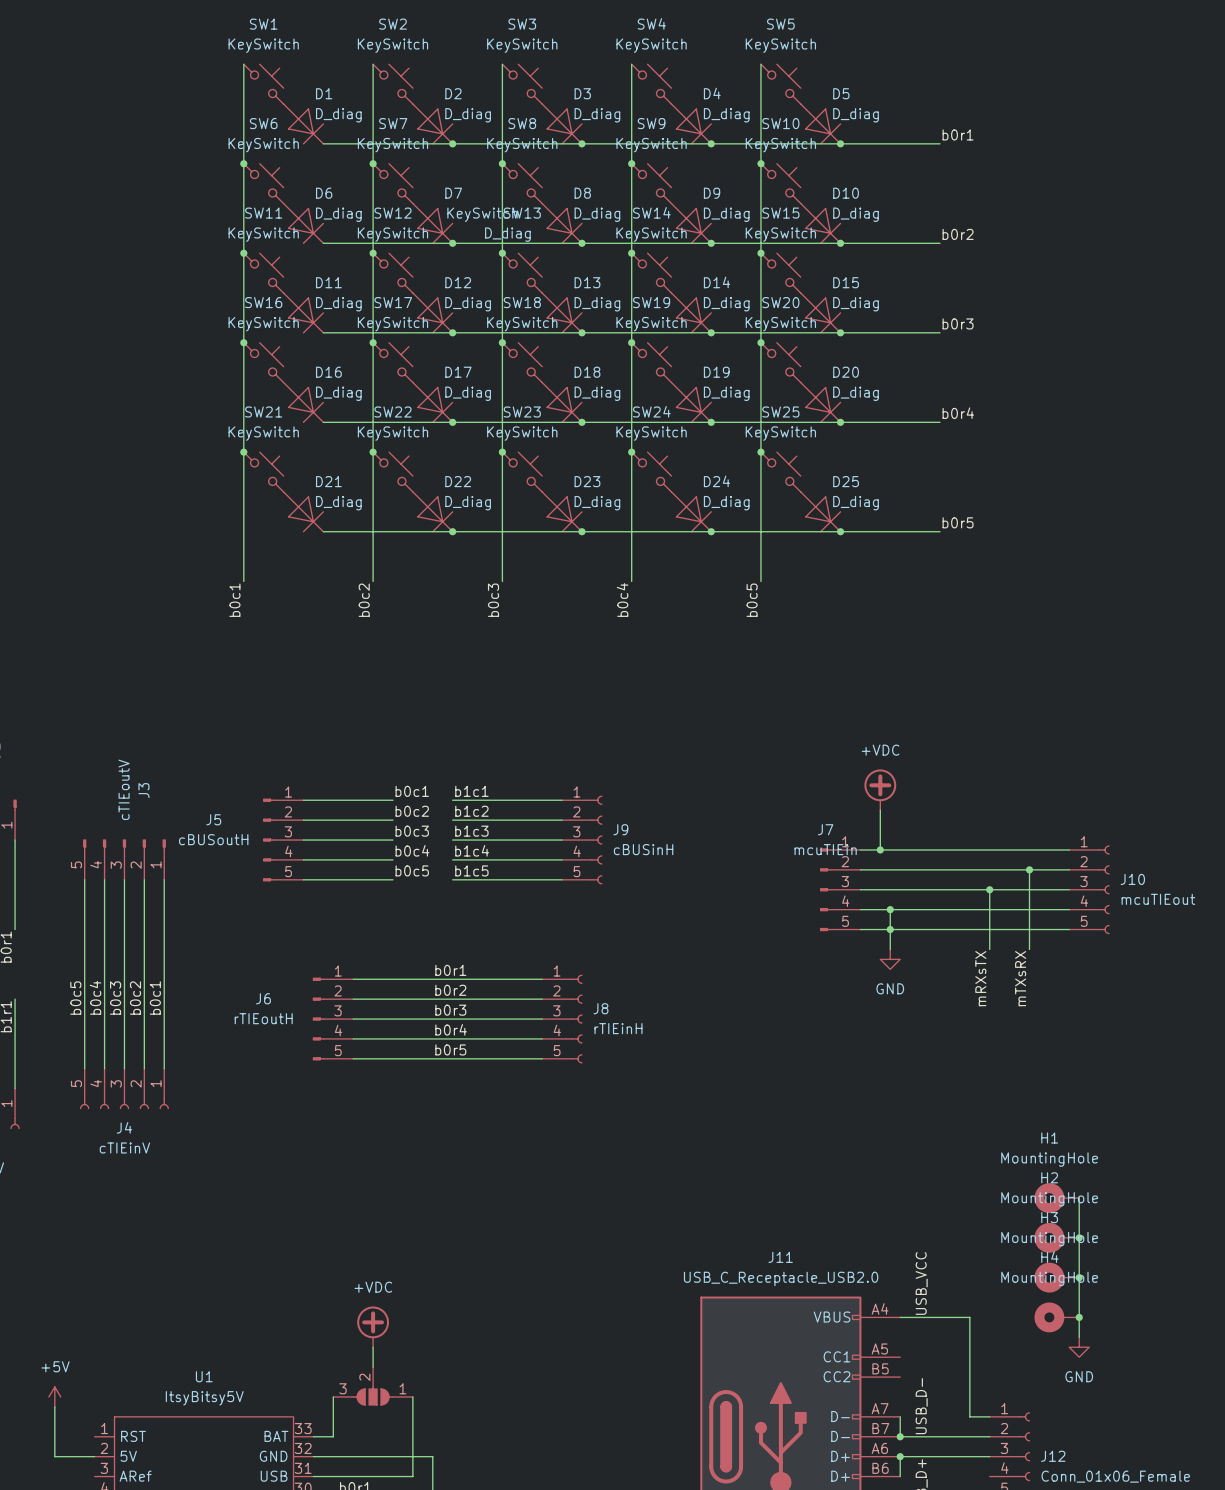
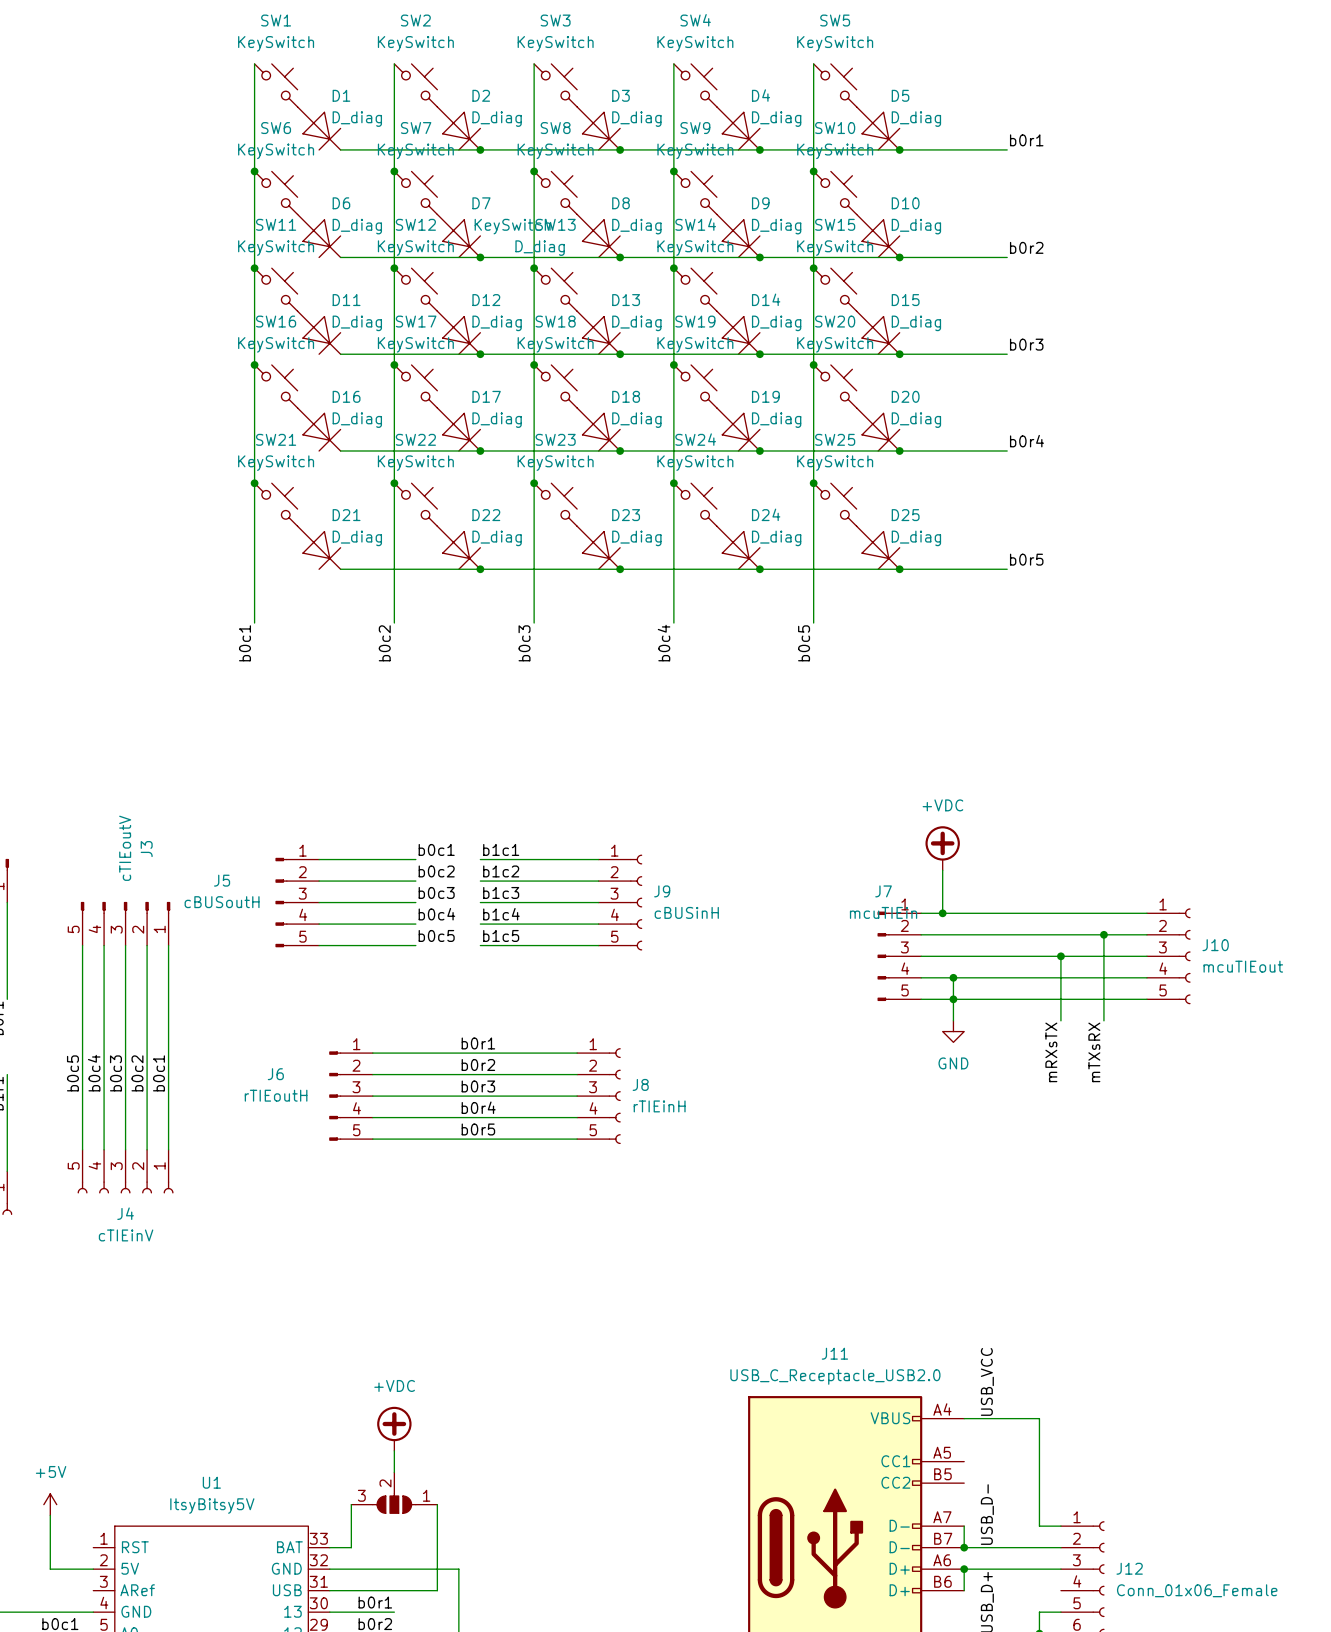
H1: MountingHole (1056, 1198) -> none
wire: (1079, 1198) (1079, 1337) -> none
H2: MountingHole (1056, 1237) -> none
junction: (1079, 1237) -> none
H3: MountingHole (1056, 1277) -> none
junction: (1079, 1277) -> none
H4: MountingHole (1056, 1317) -> none
junction: (1079, 1317) -> none
power symbol: GND (1079, 1347) -> none

